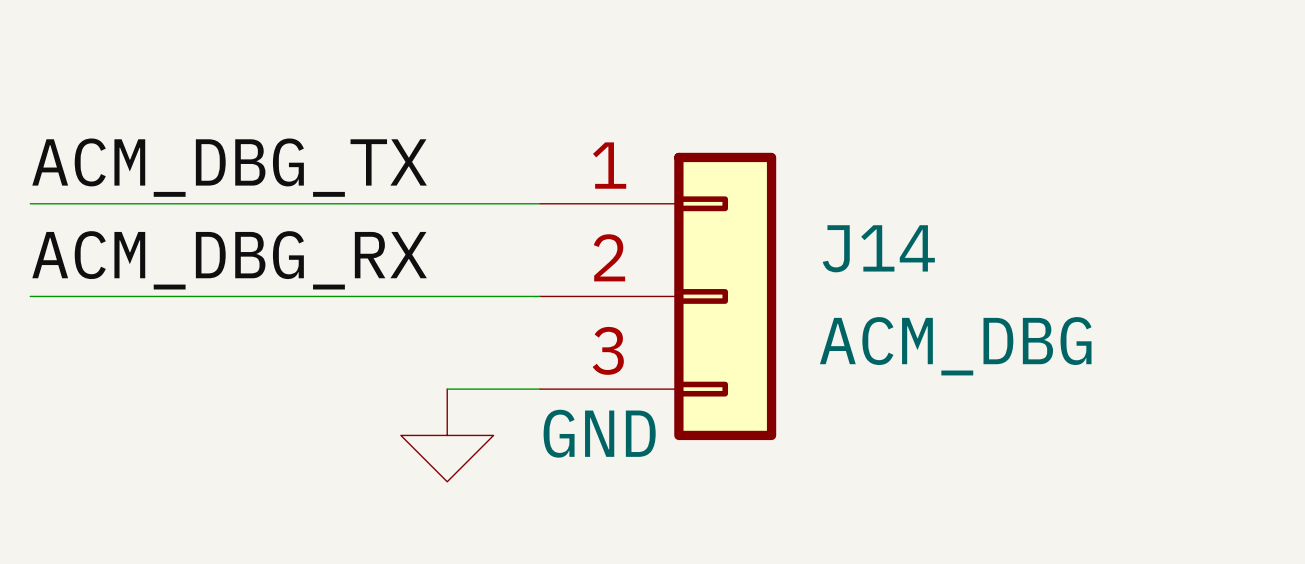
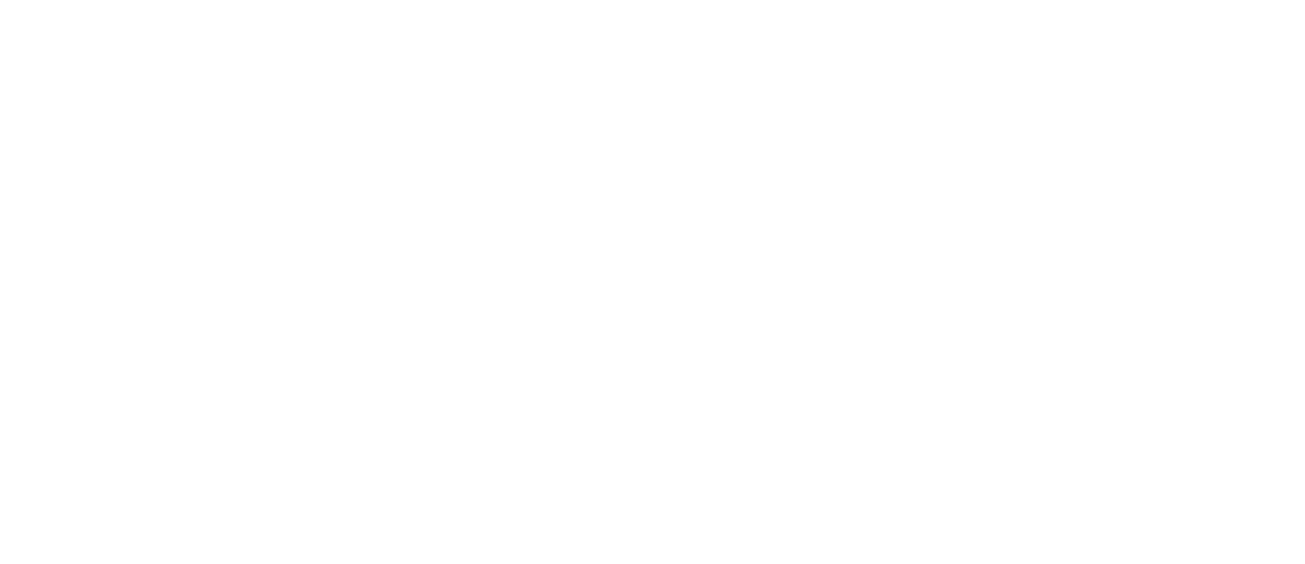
label: ACM_DBG_TX (229, 167) -> none
wire: (30, 203) (539, 203) -> none
label: ACM_DBG_RX (229, 260) -> none
wire: (30, 296) (539, 296) -> none
J14: ACM_DBG (658, 296) -> none
wire: (447, 389) (539, 389) -> none
power symbol: GND (447, 435) -> none

